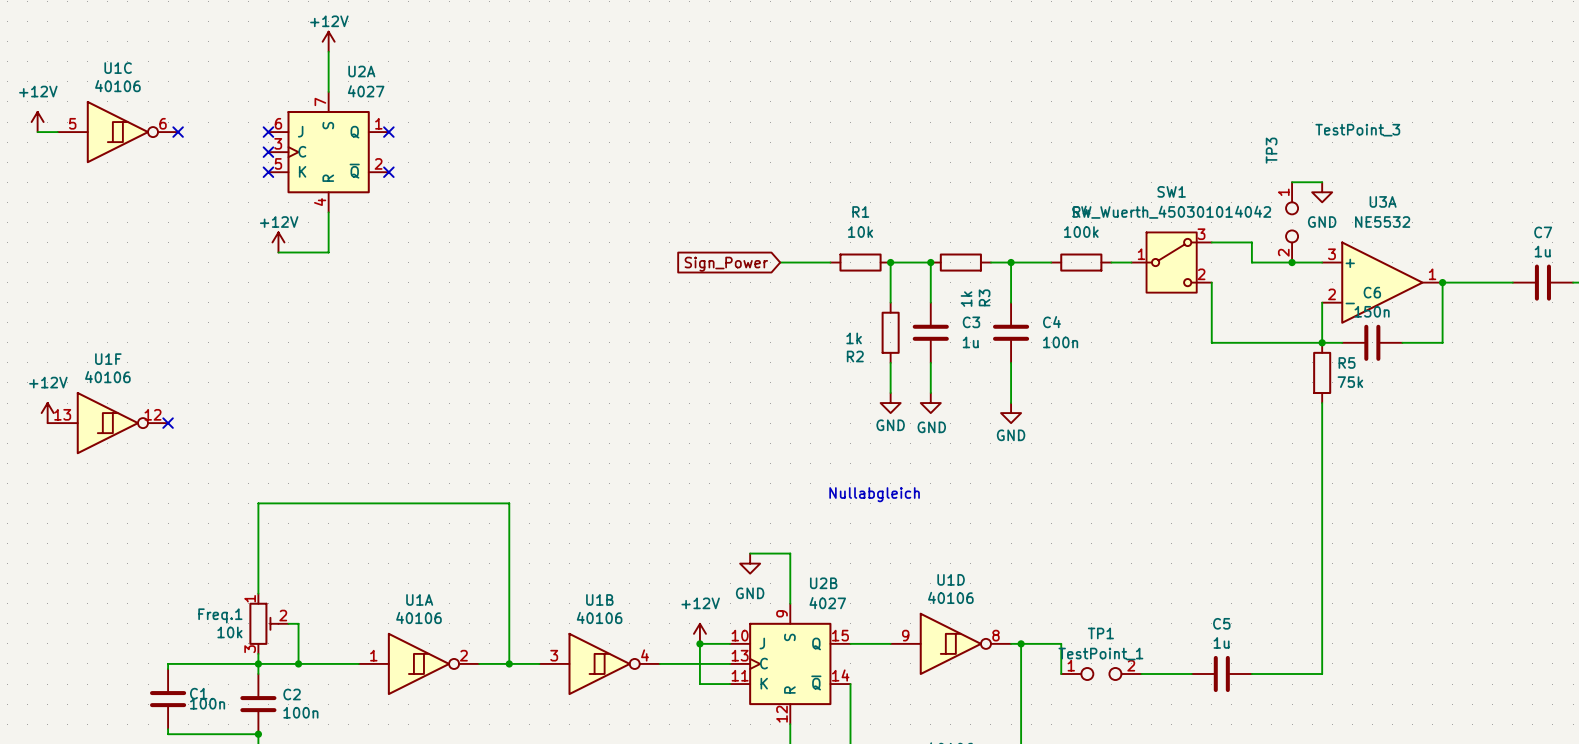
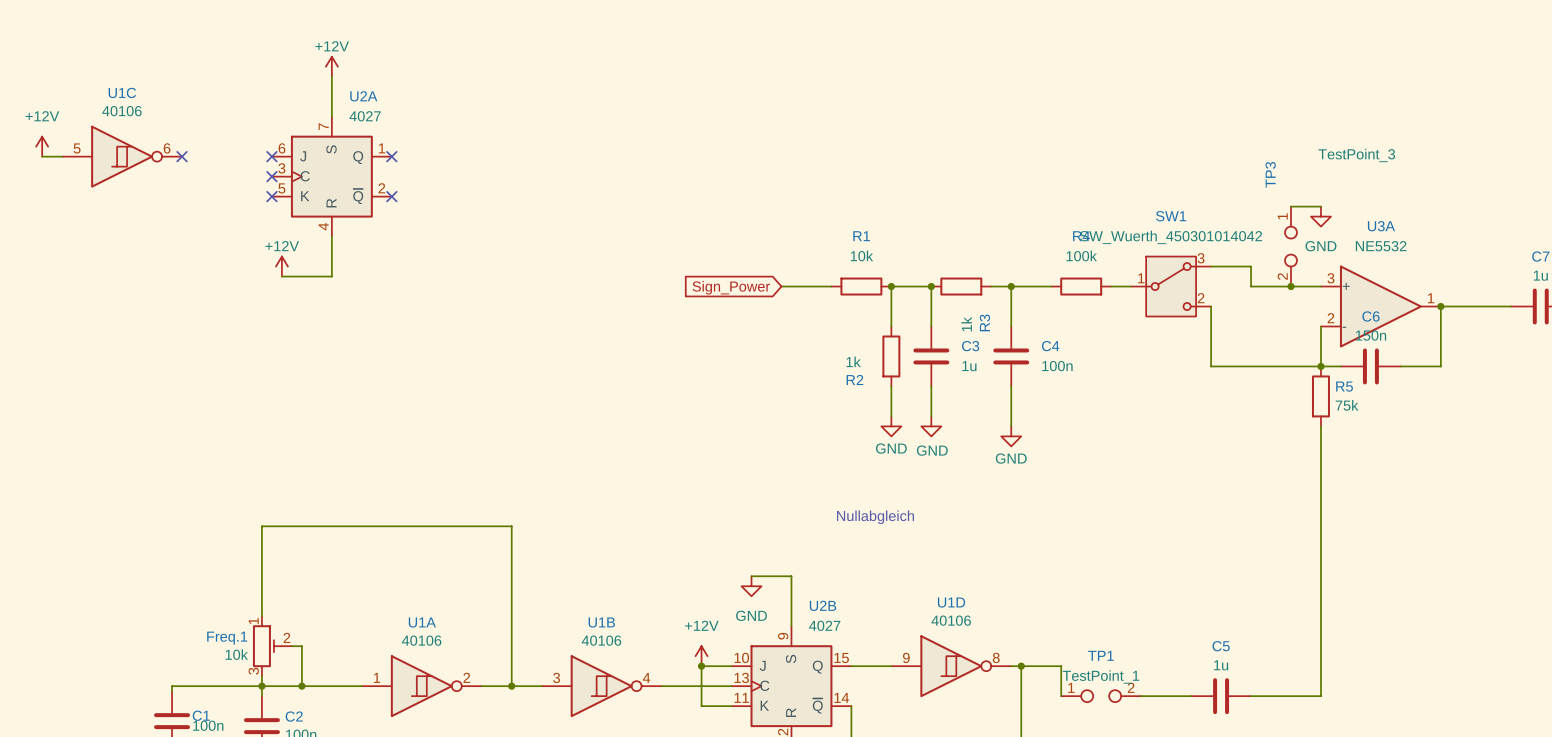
power symbol: +12V (47, 413) -> none
U1F: 40106 (107, 423) -> none
no-connect mark: (168, 423) -> none

